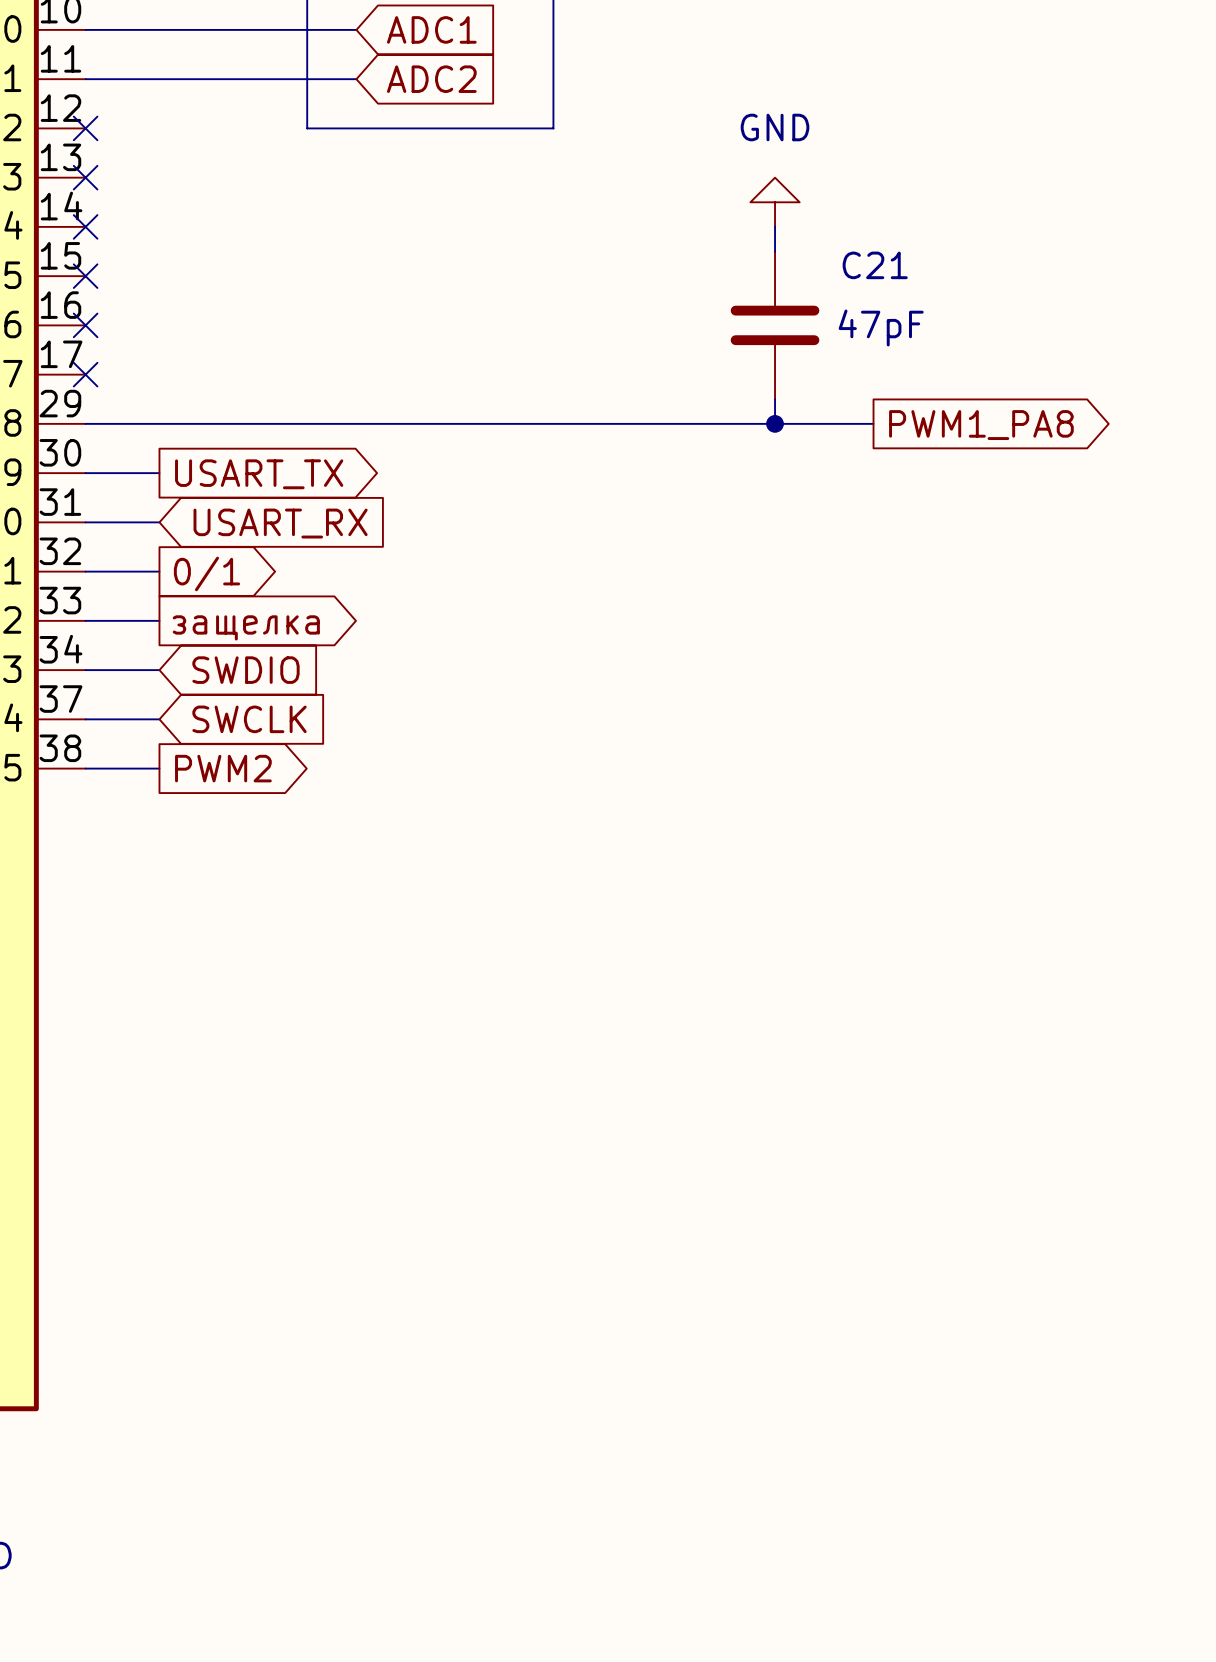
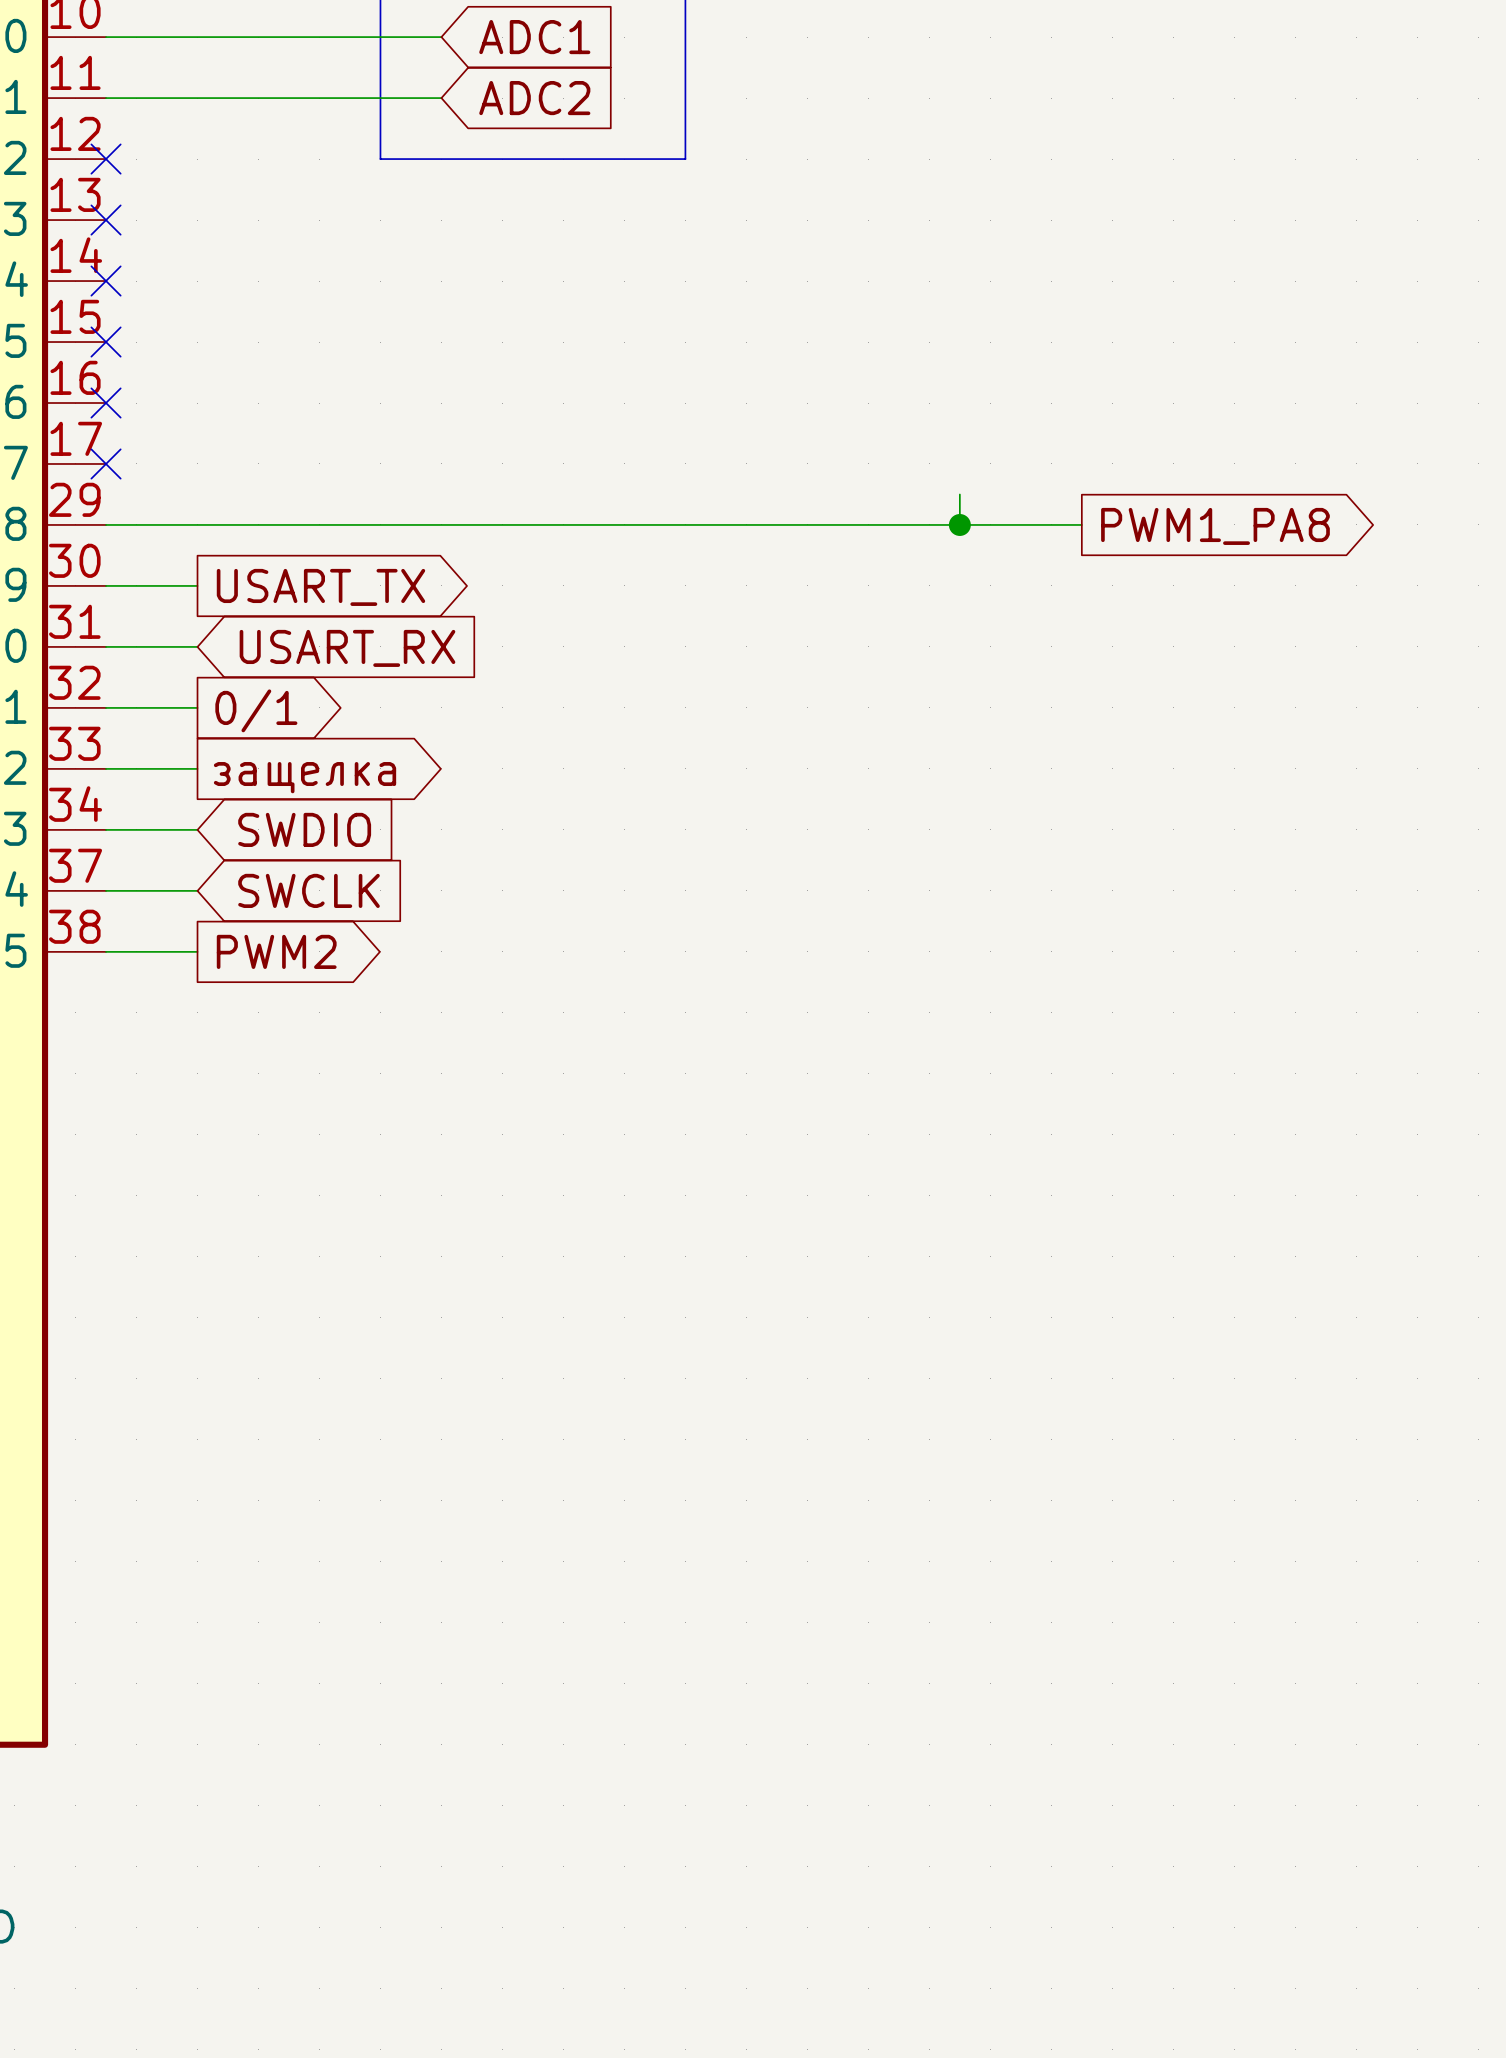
power symbol: GND (775, 202) -> none
wire: (775, 226) (775, 251) -> none
C21: 47pF (775, 325) -> none

